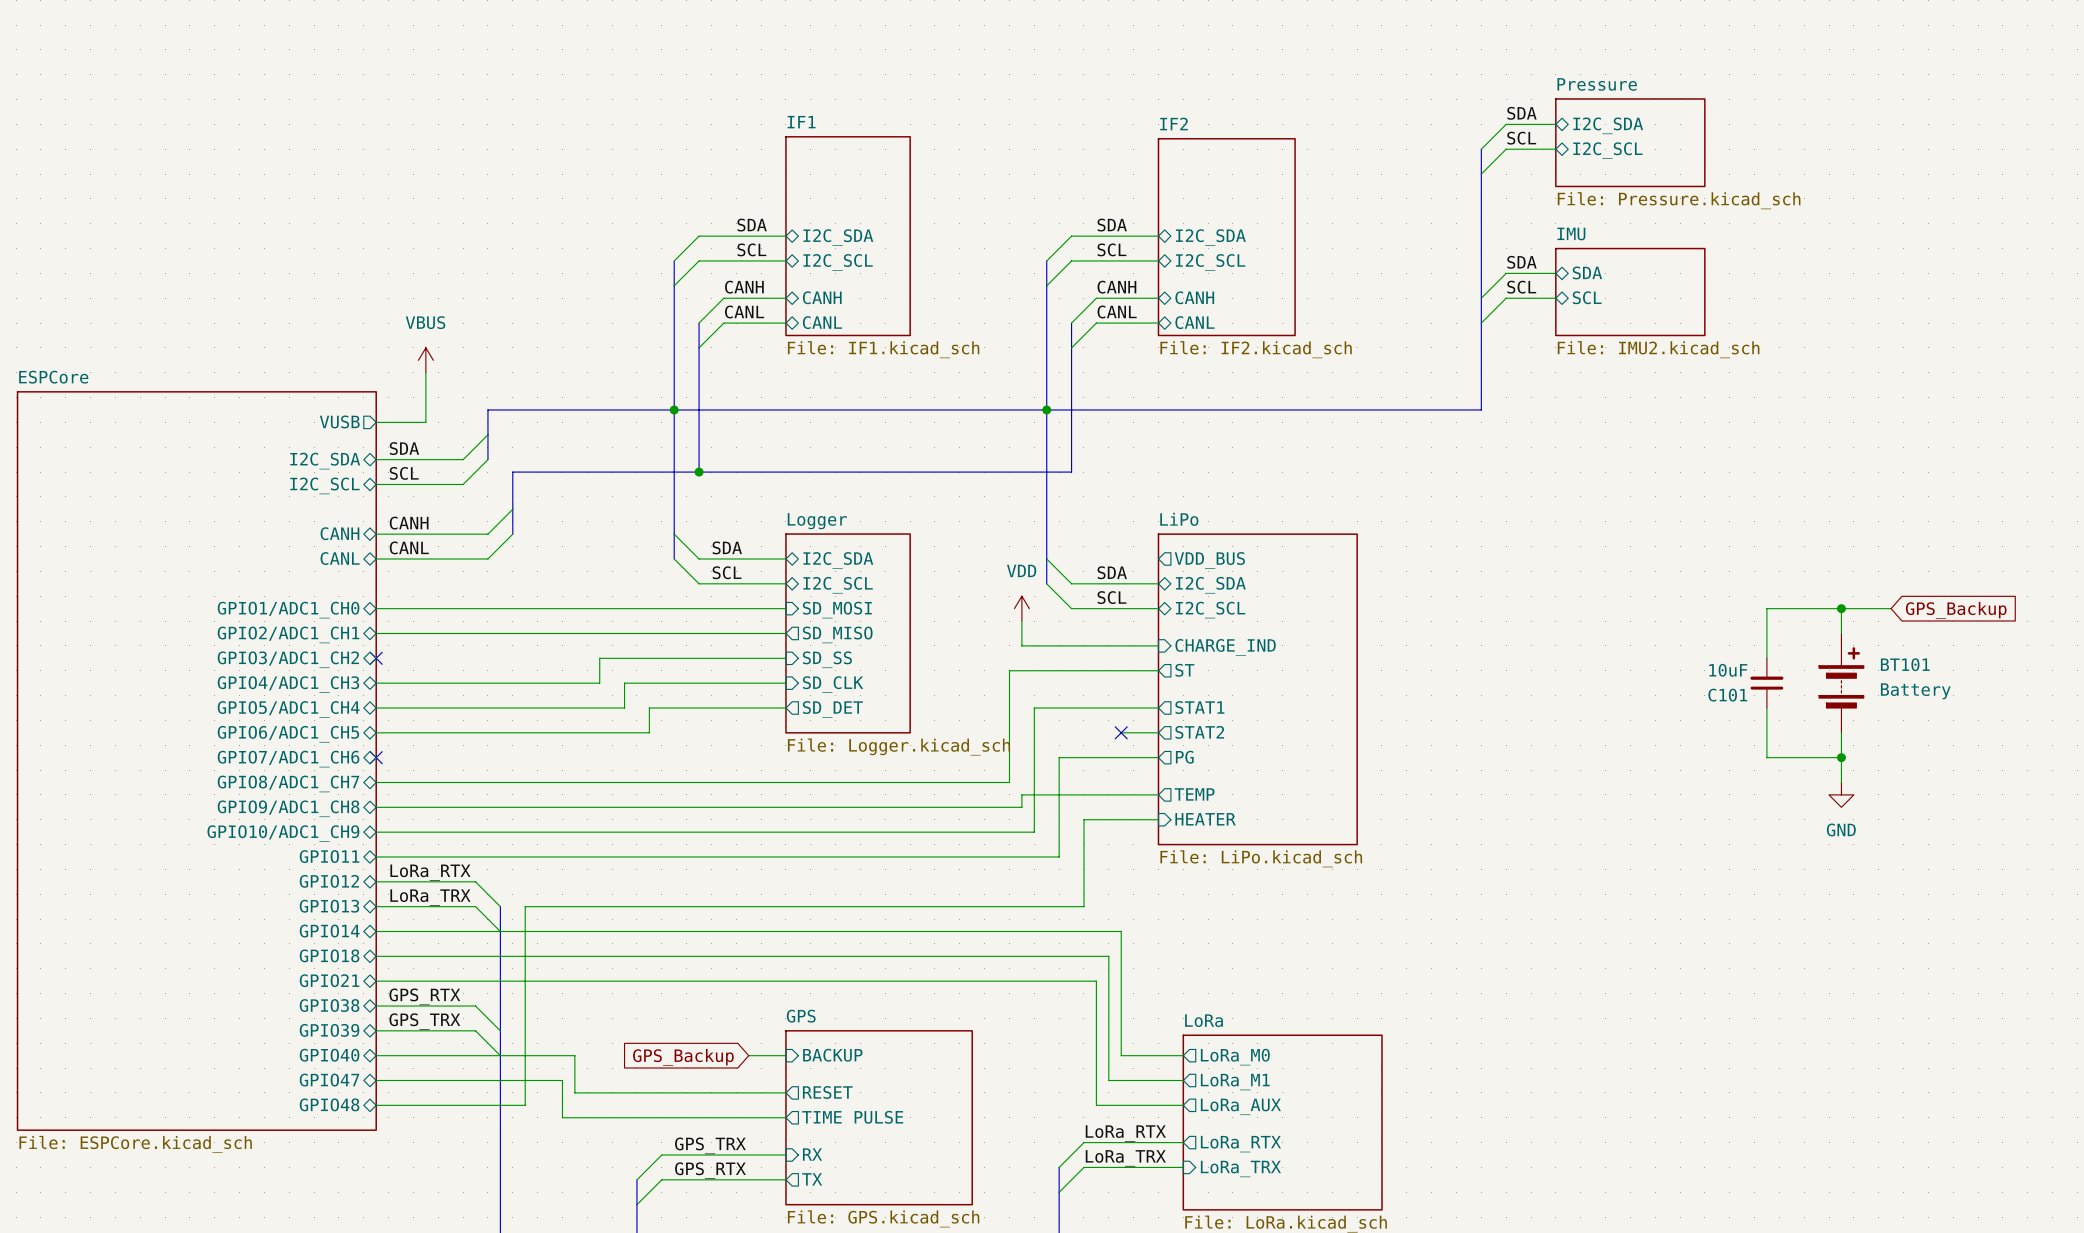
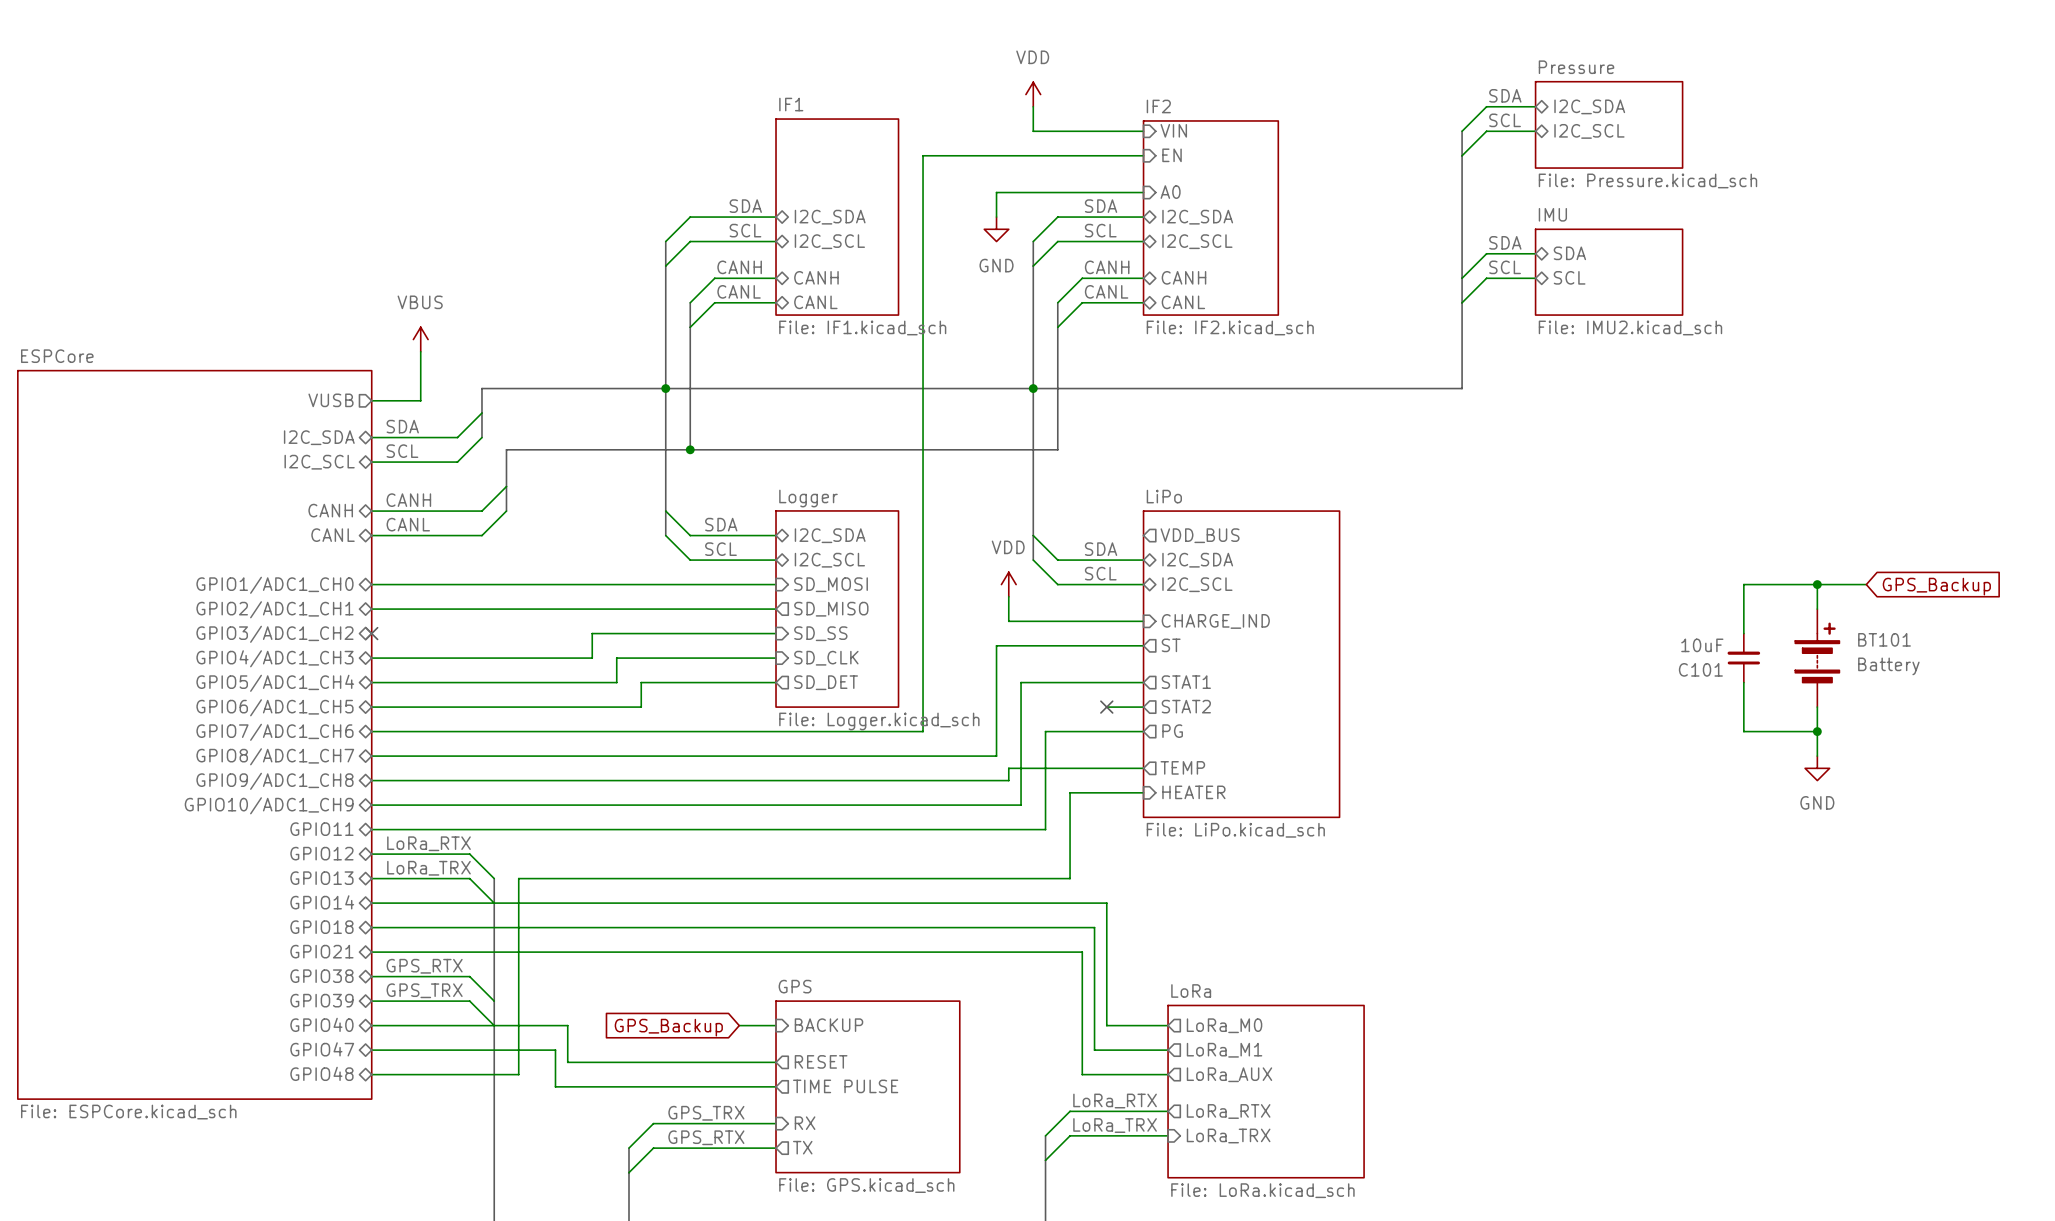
power symbol: none -> VDD (1033, 94)
wire: none -> (1033, 106) (1033, 131) (1143, 131)
sheet pin: none -> VIN (1173, 130)
sheet pin: none -> EN (1172, 155)
wire: none -> (1143, 155) (923, 155) (923, 731) (371, 731)
sheet pin: none -> A0 (1170, 192)
wire: none -> (1143, 192) (996, 192) (996, 217)
power symbol: none -> GND (996, 229)
no-connect mark: (376, 757) -> none

